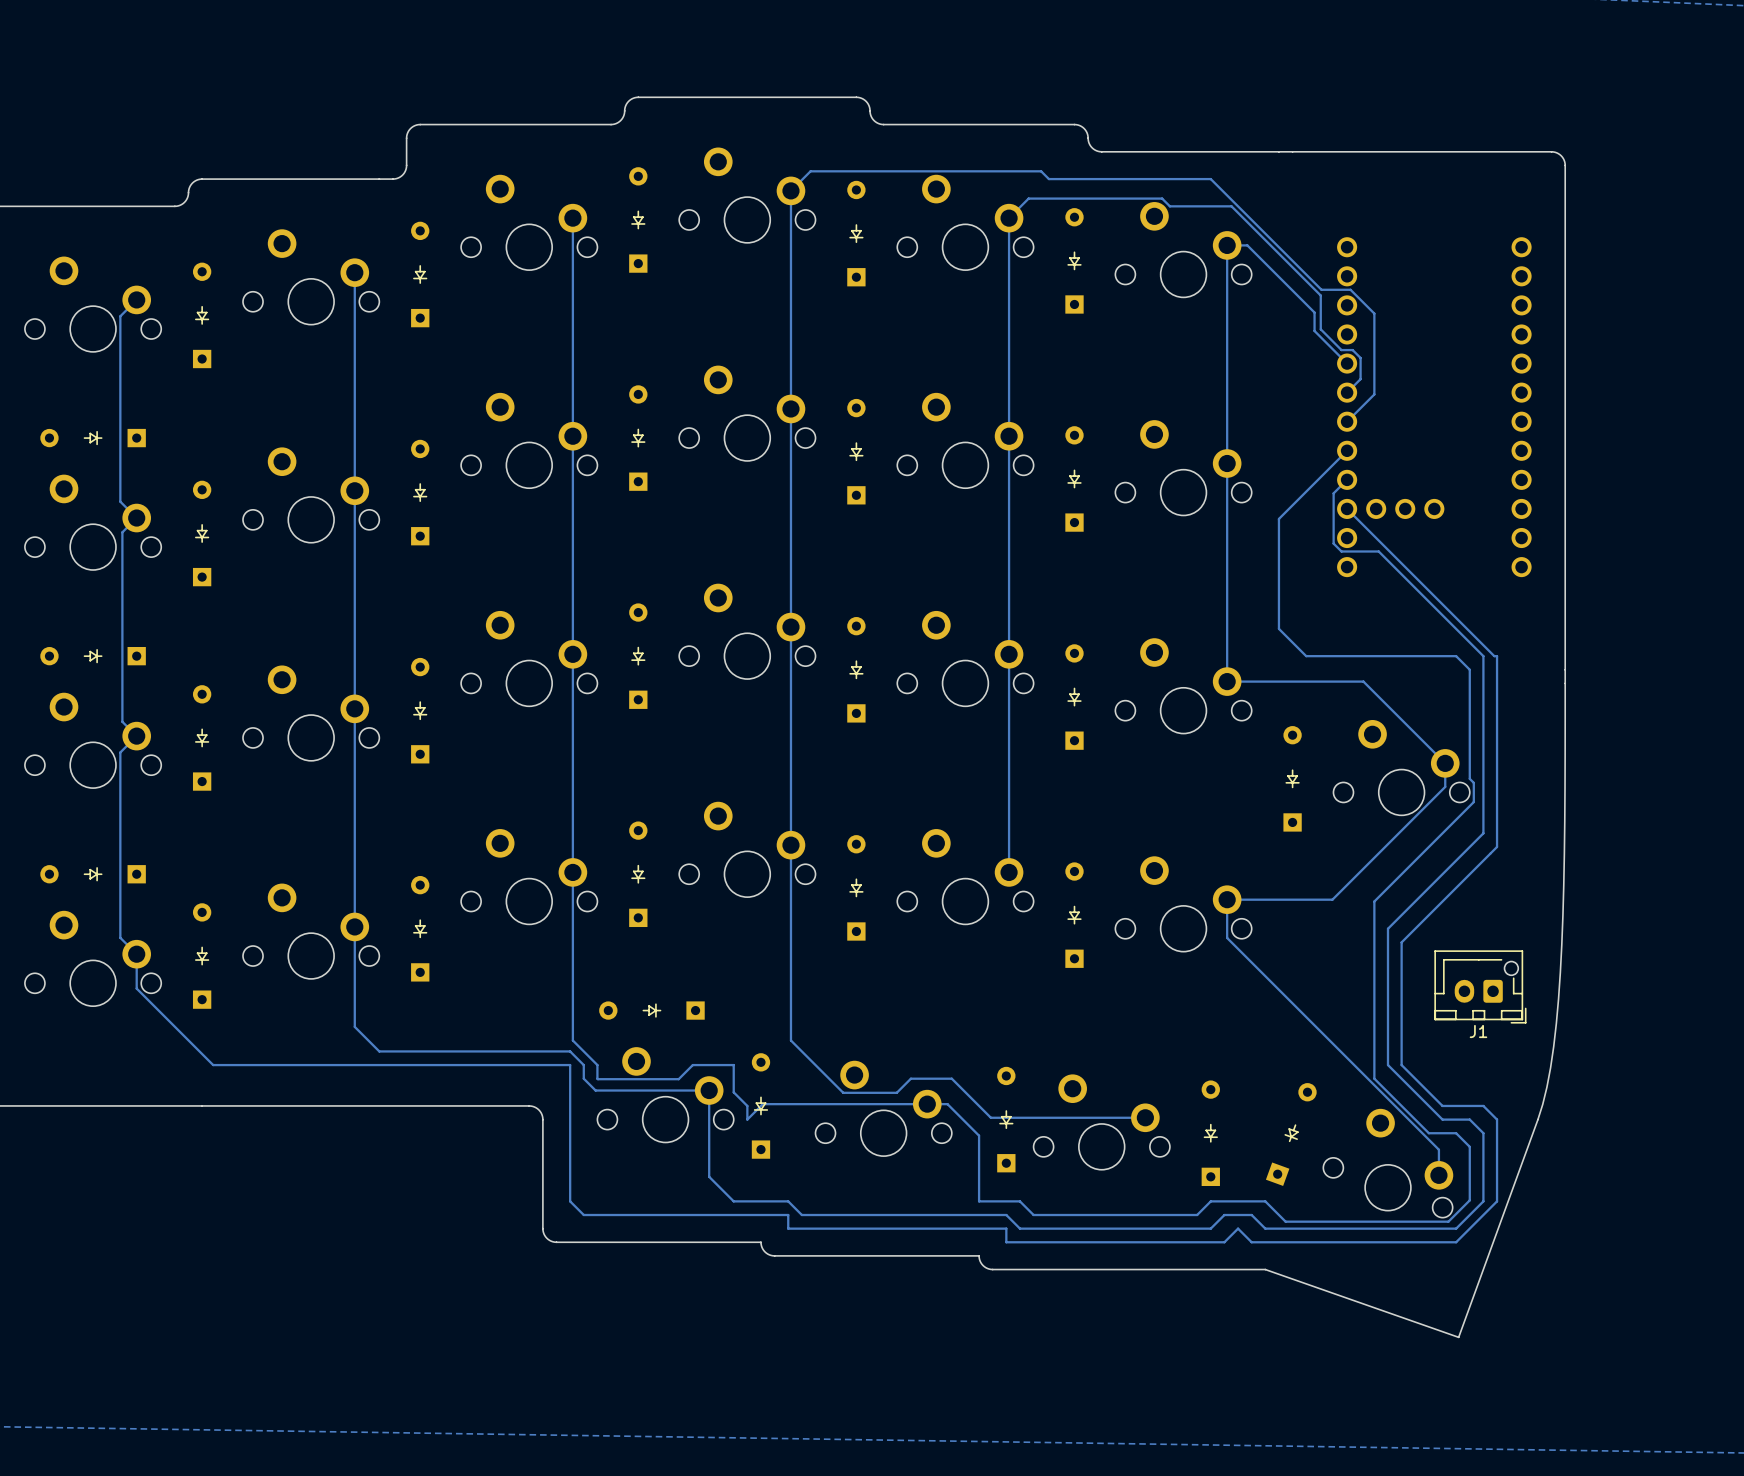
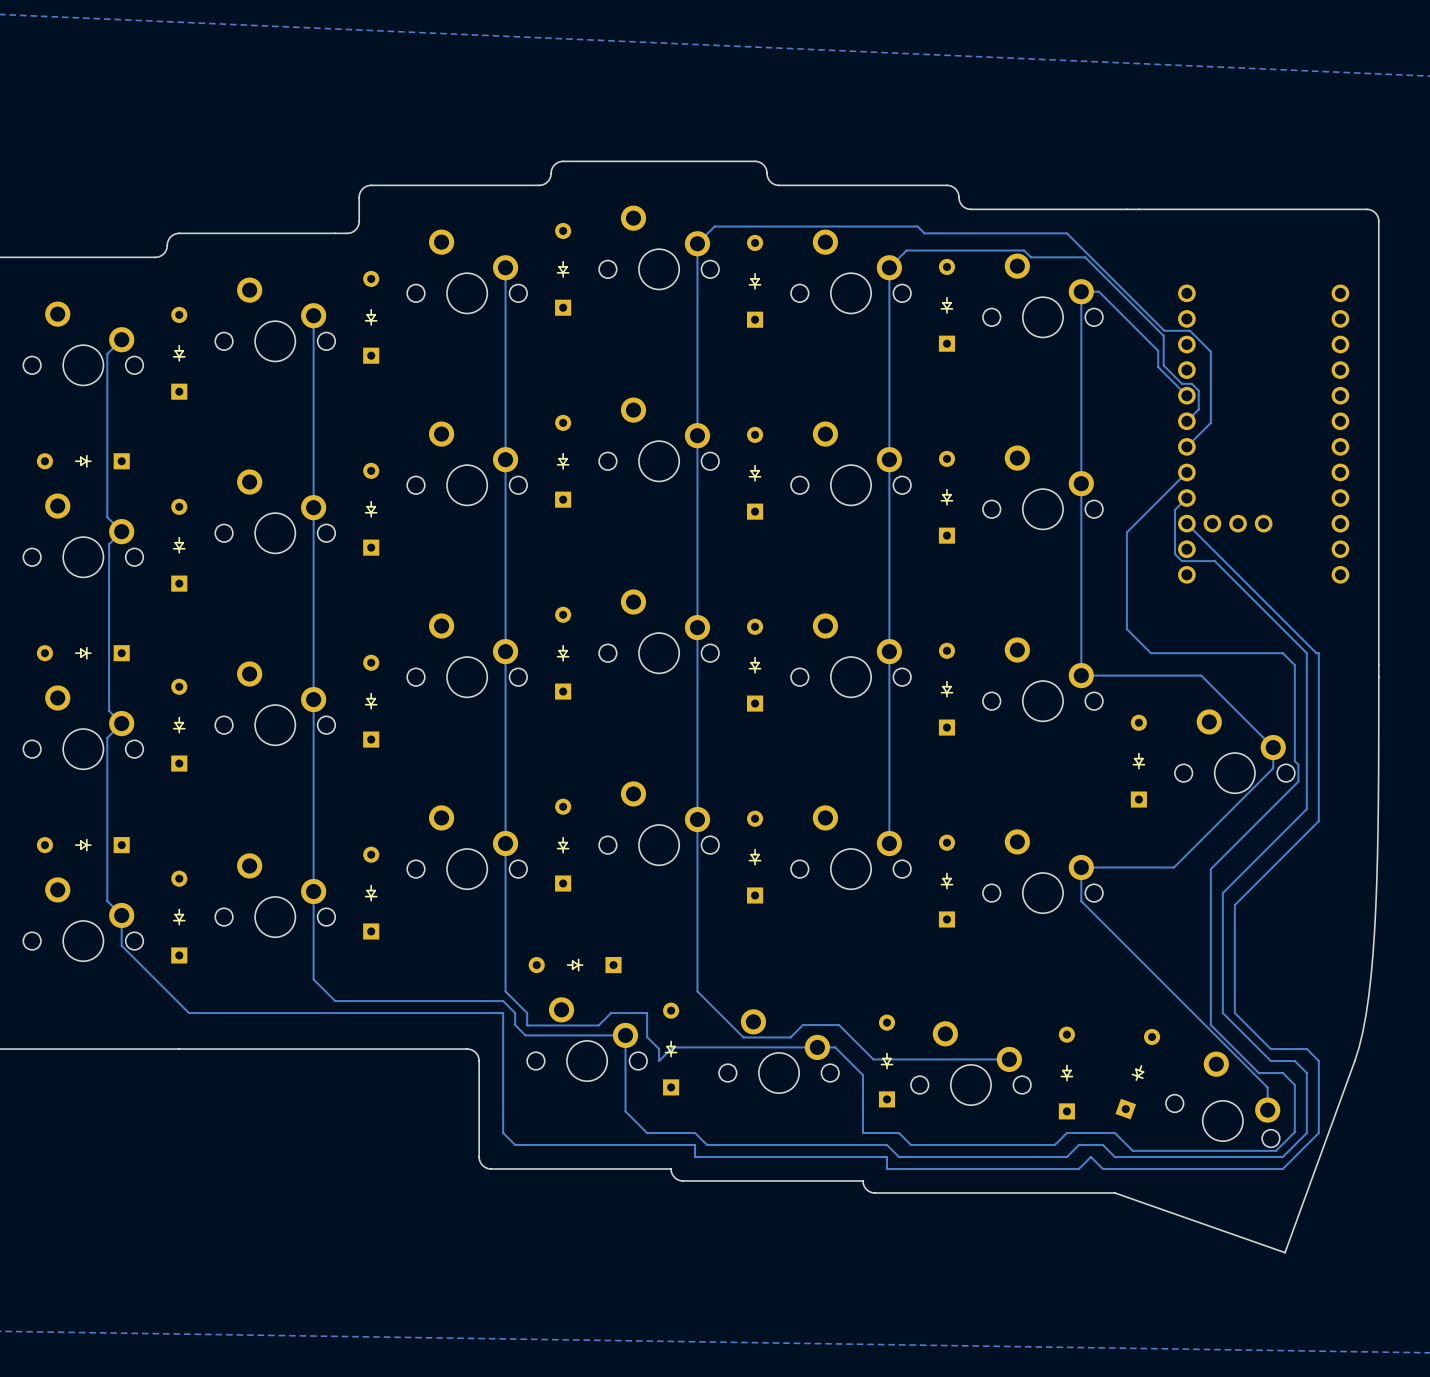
J1: (1480, 986) -> none

